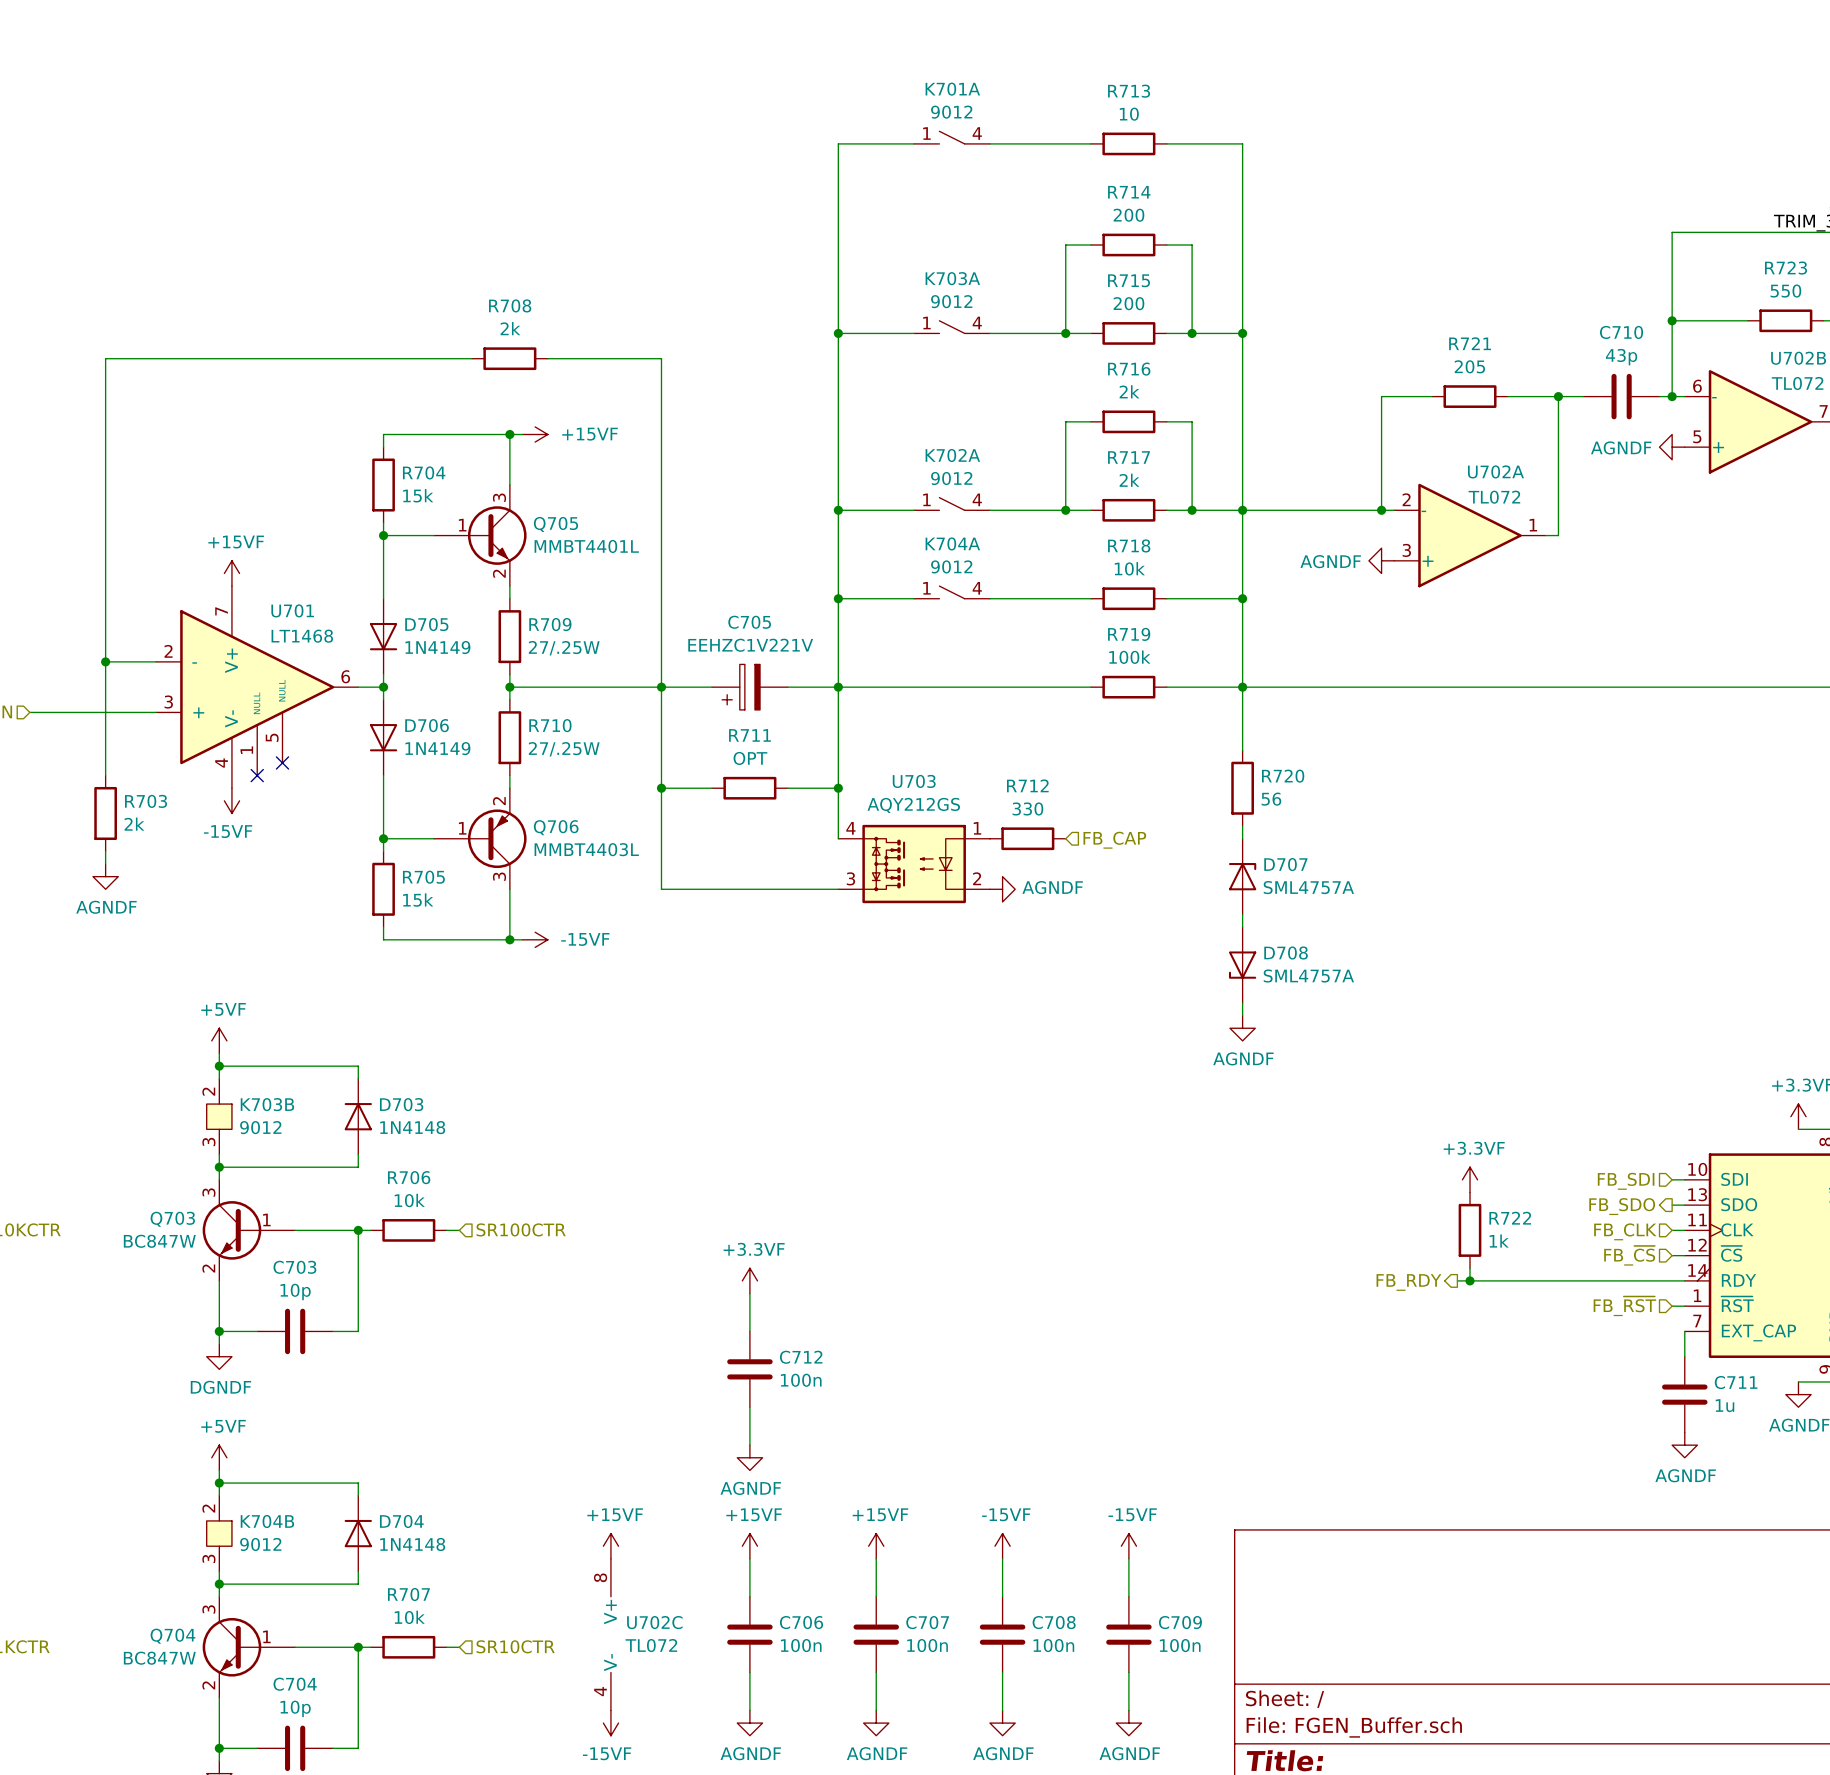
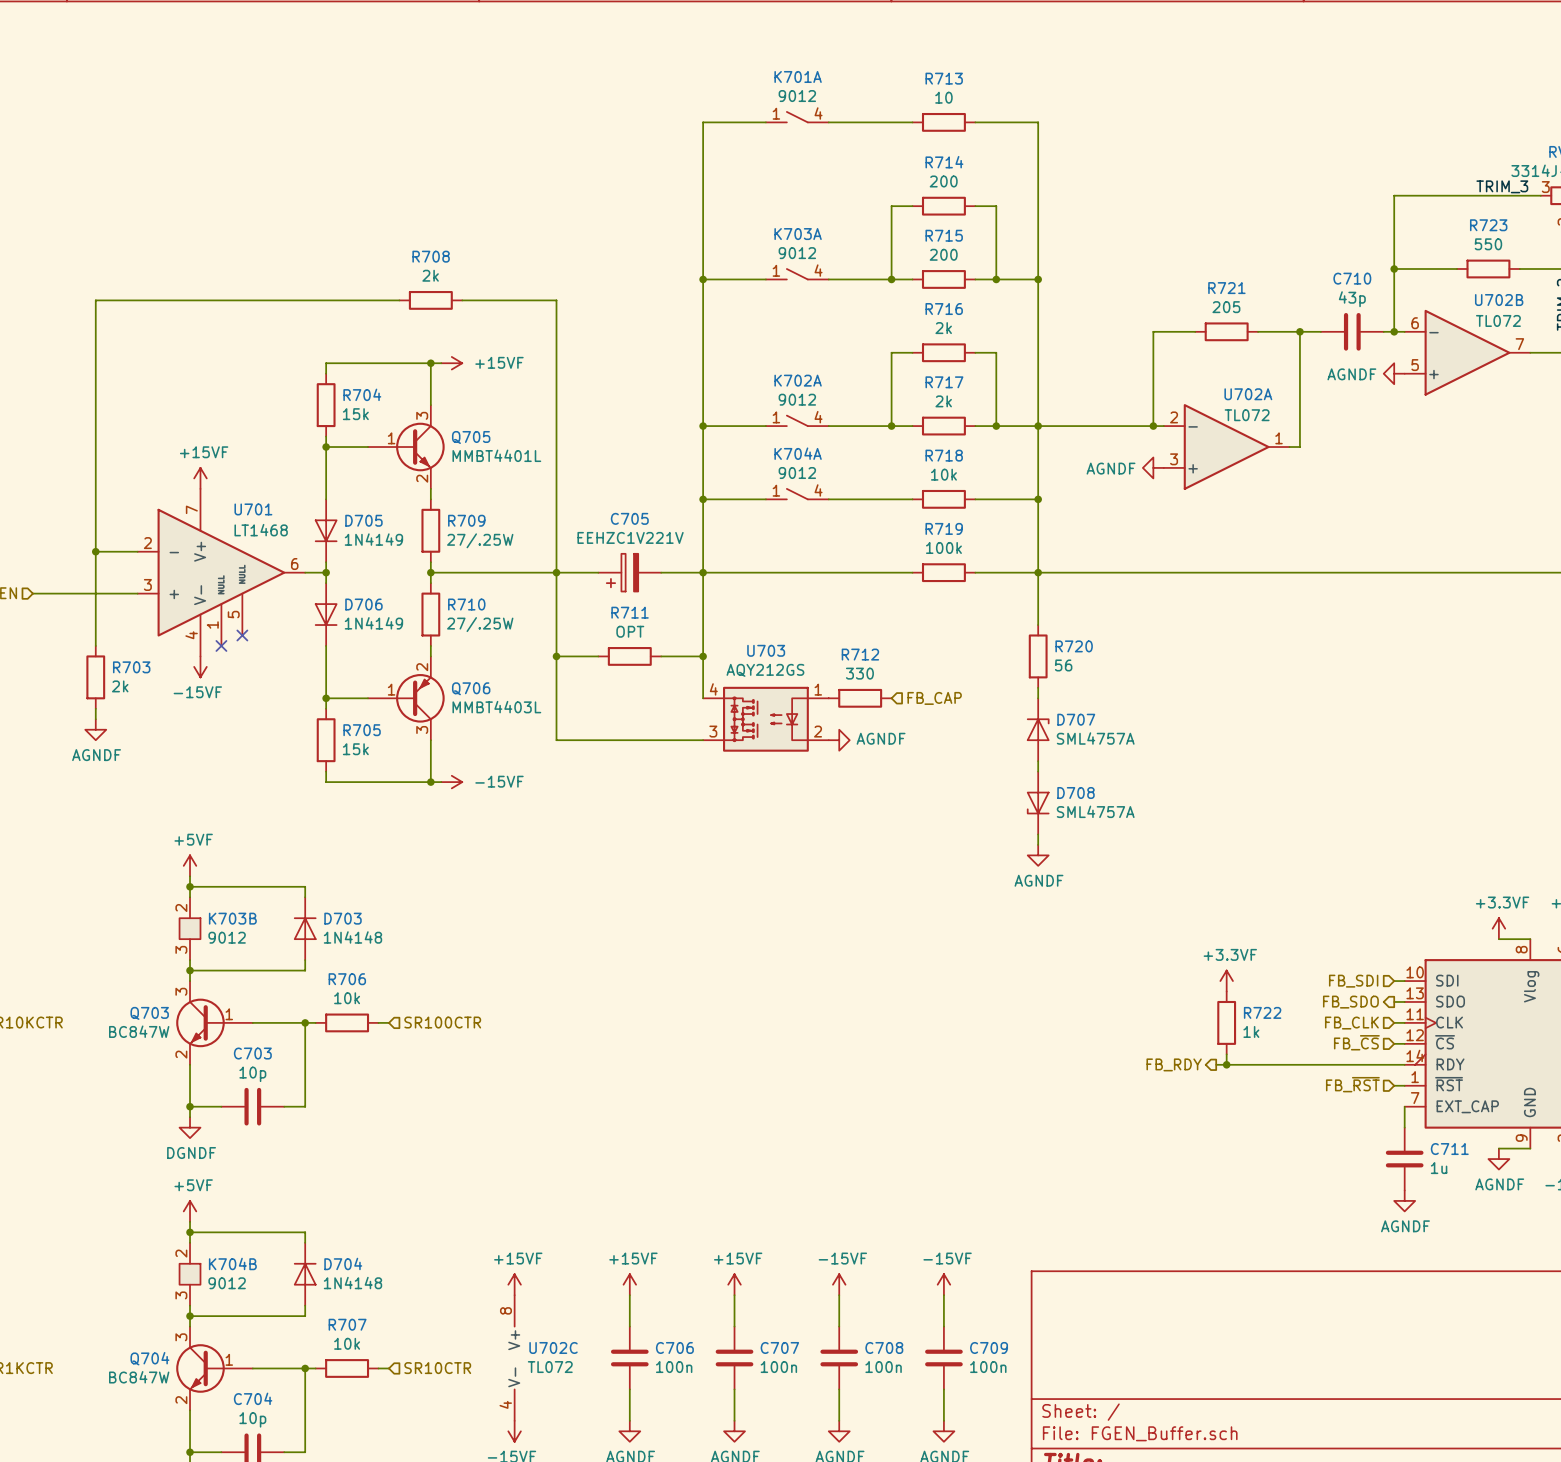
power symbol: +3.3VF (749, 1280) -> none
wire: (749, 1293) (749, 1331) -> none
C712: 100n (749, 1369) -> none
wire: (749, 1407) (749, 1445) -> none
power symbol: AGNDF (749, 1457) -> none

